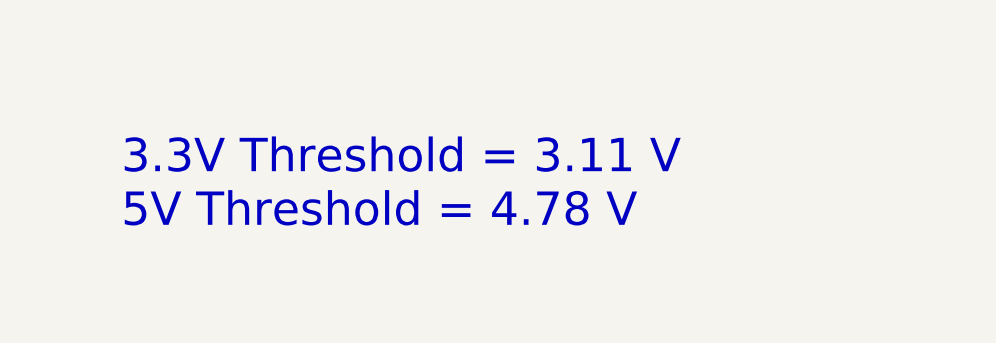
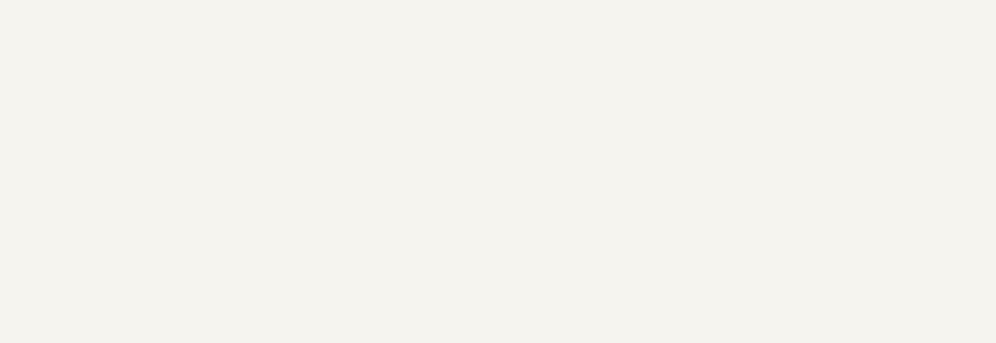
text: 3.3V Threshold = 3.11 V (402, 154) -> none
text: 5V Threshold = 4.78 V (380, 207) -> none

